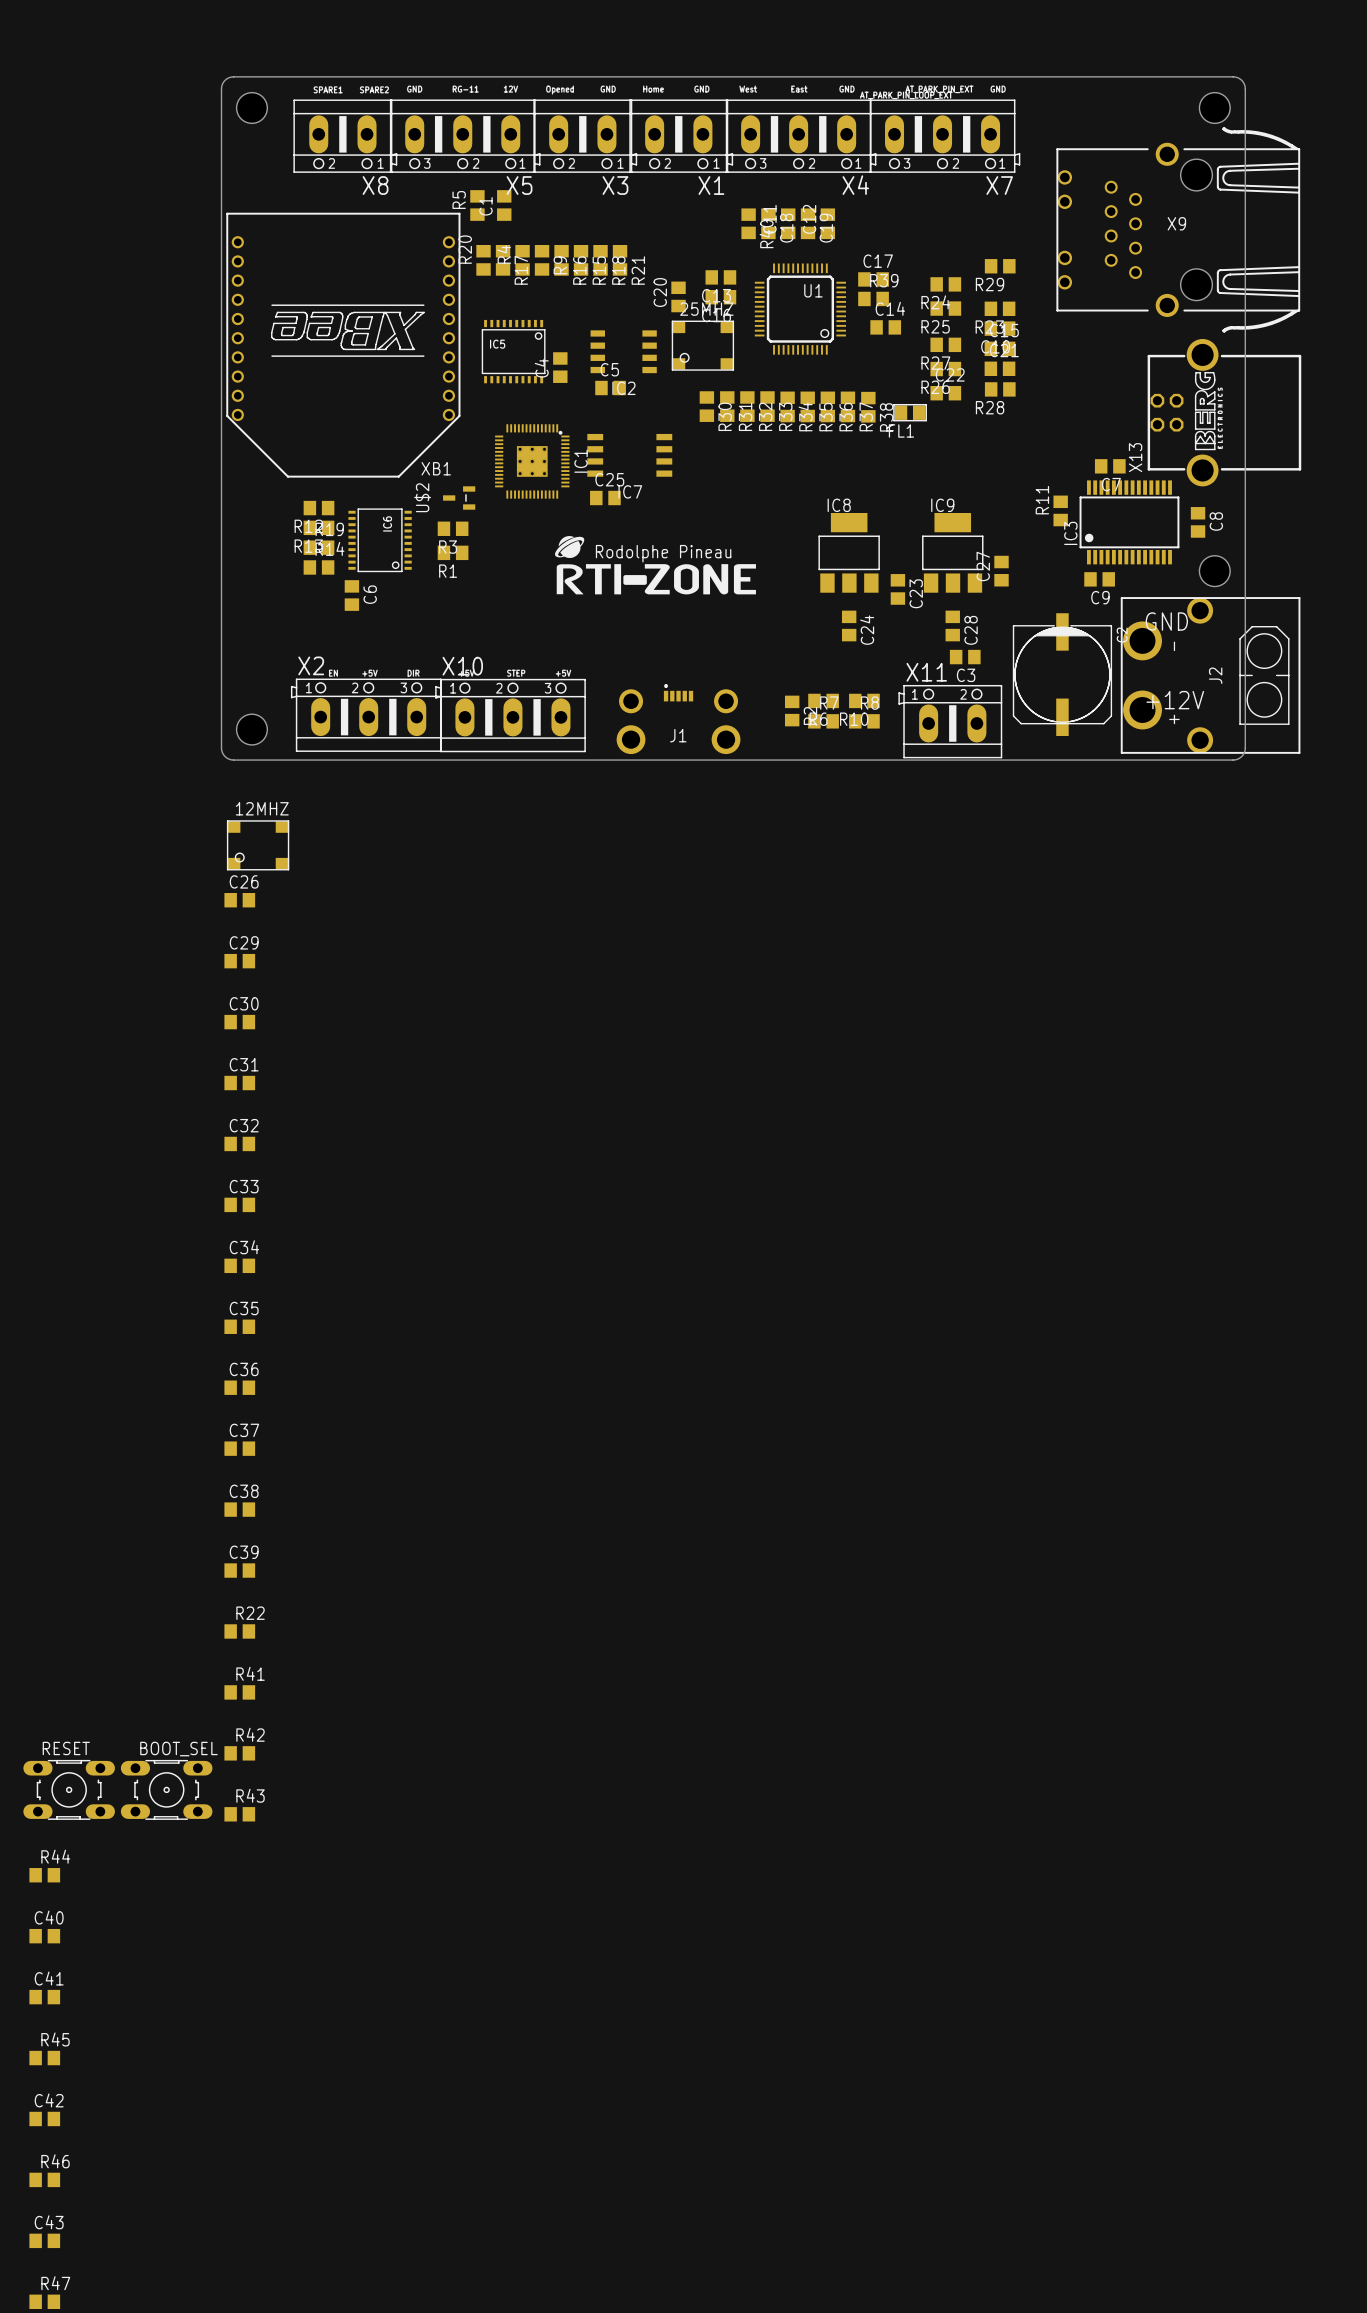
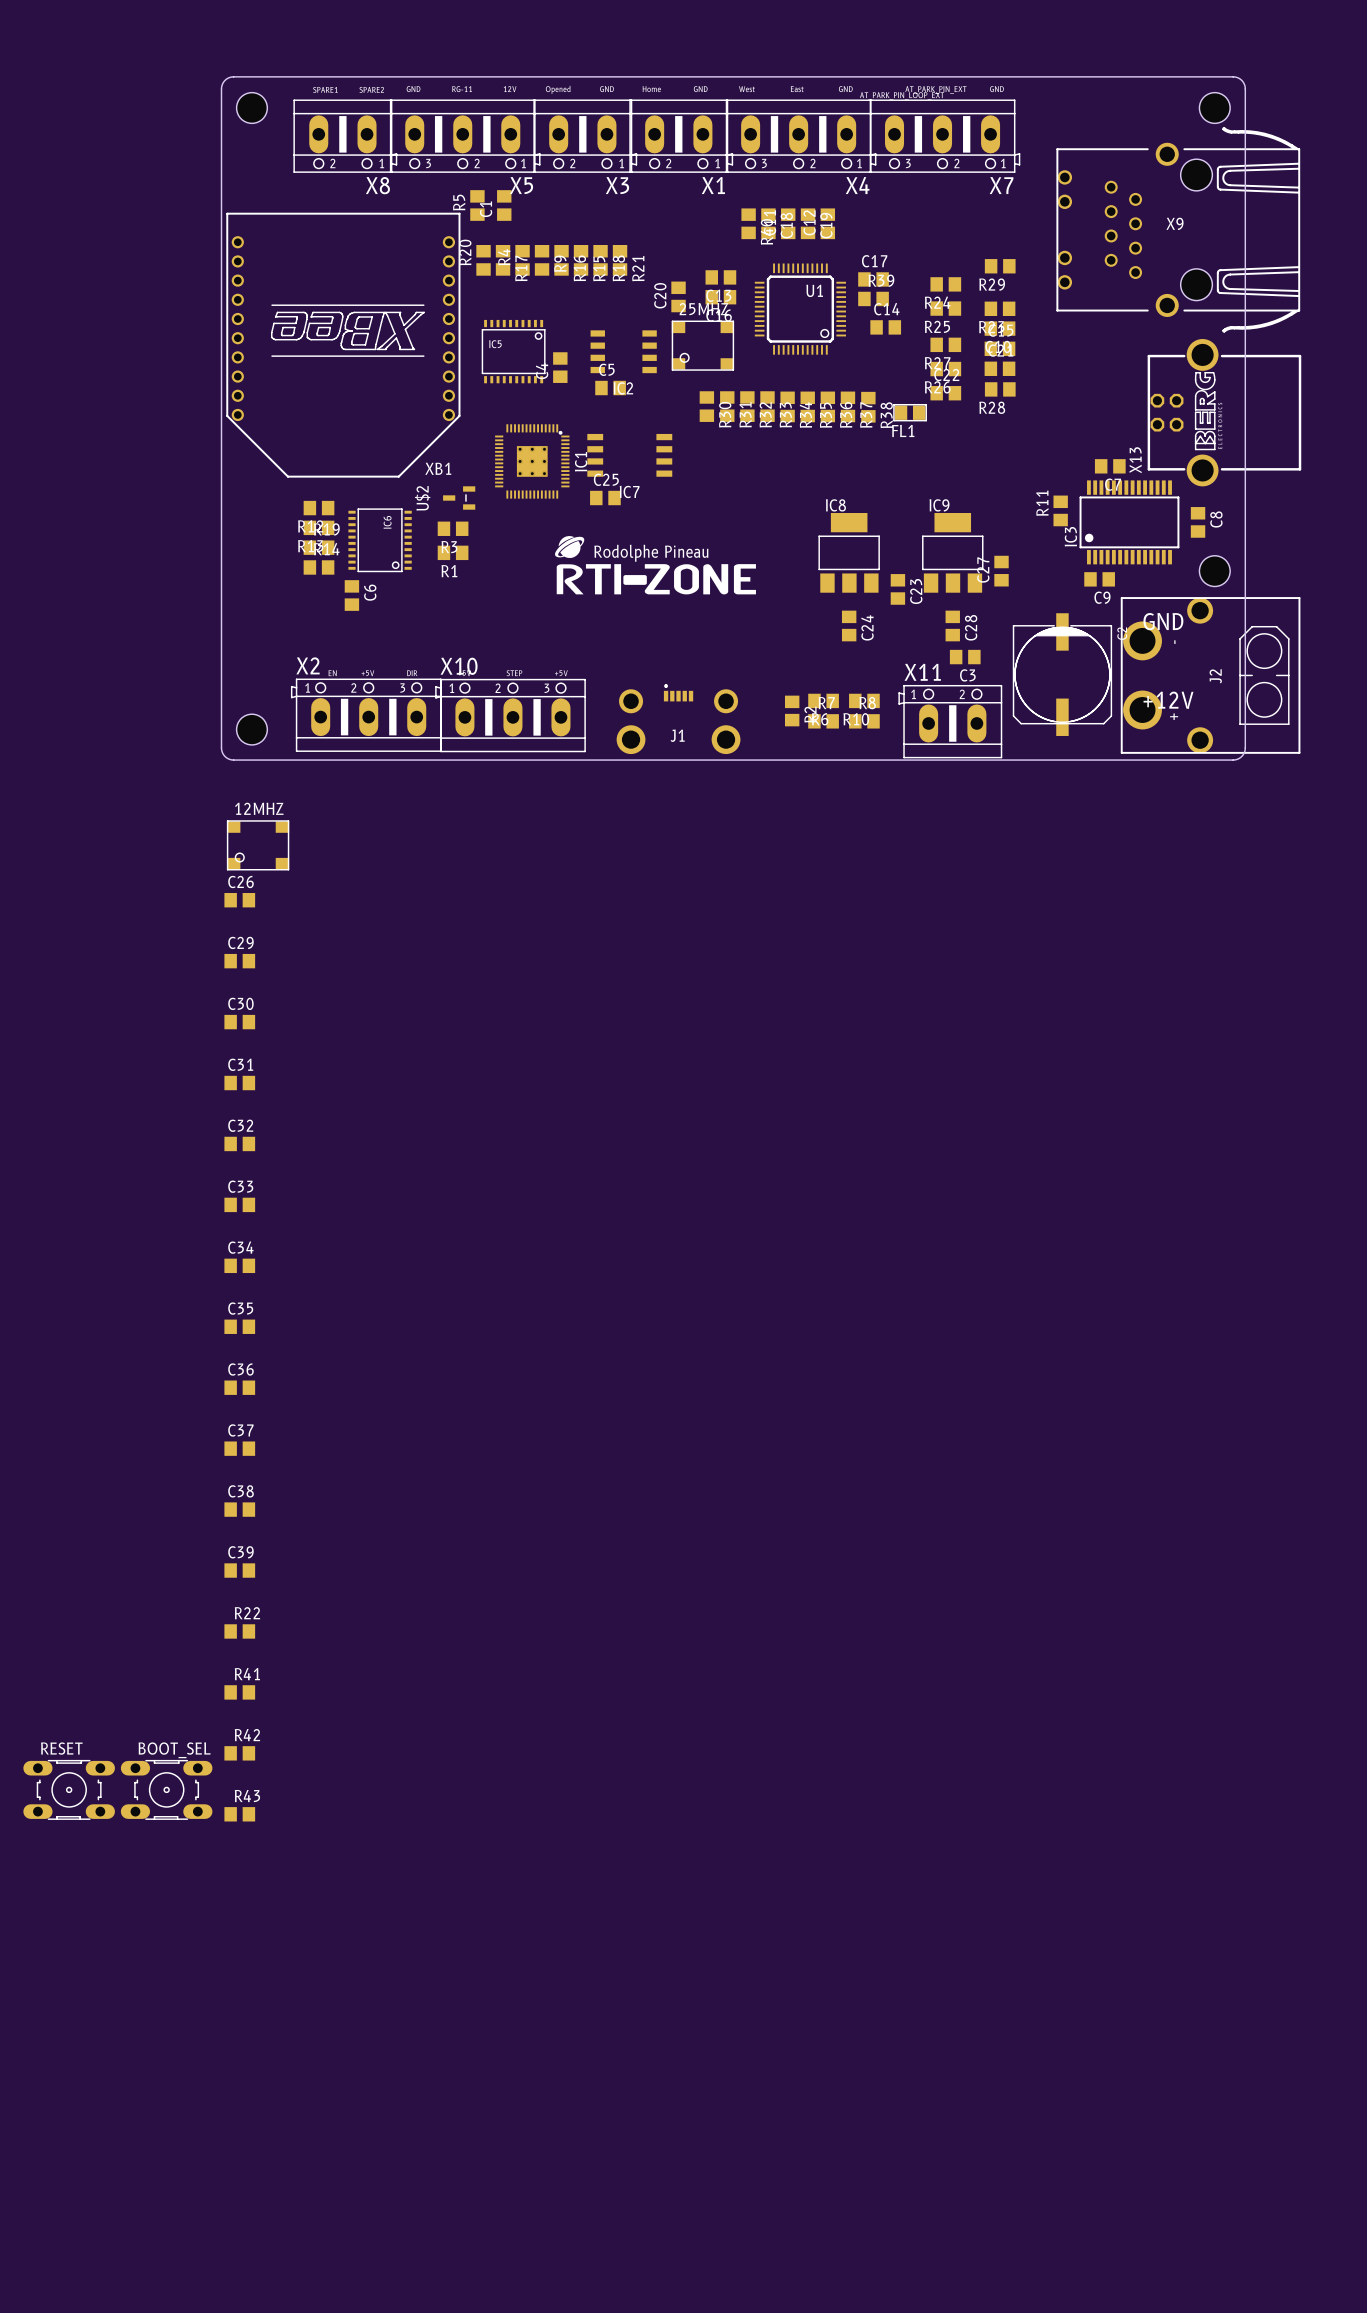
R44: (44, 1875) -> none
C40: (44, 1936) -> none
C41: (44, 1997) -> none
R45: (44, 2058) -> none
C42: (44, 2118) -> none
R46: (44, 2179) -> none
C43: (44, 2240) -> none
R47: (44, 2301) -> none

